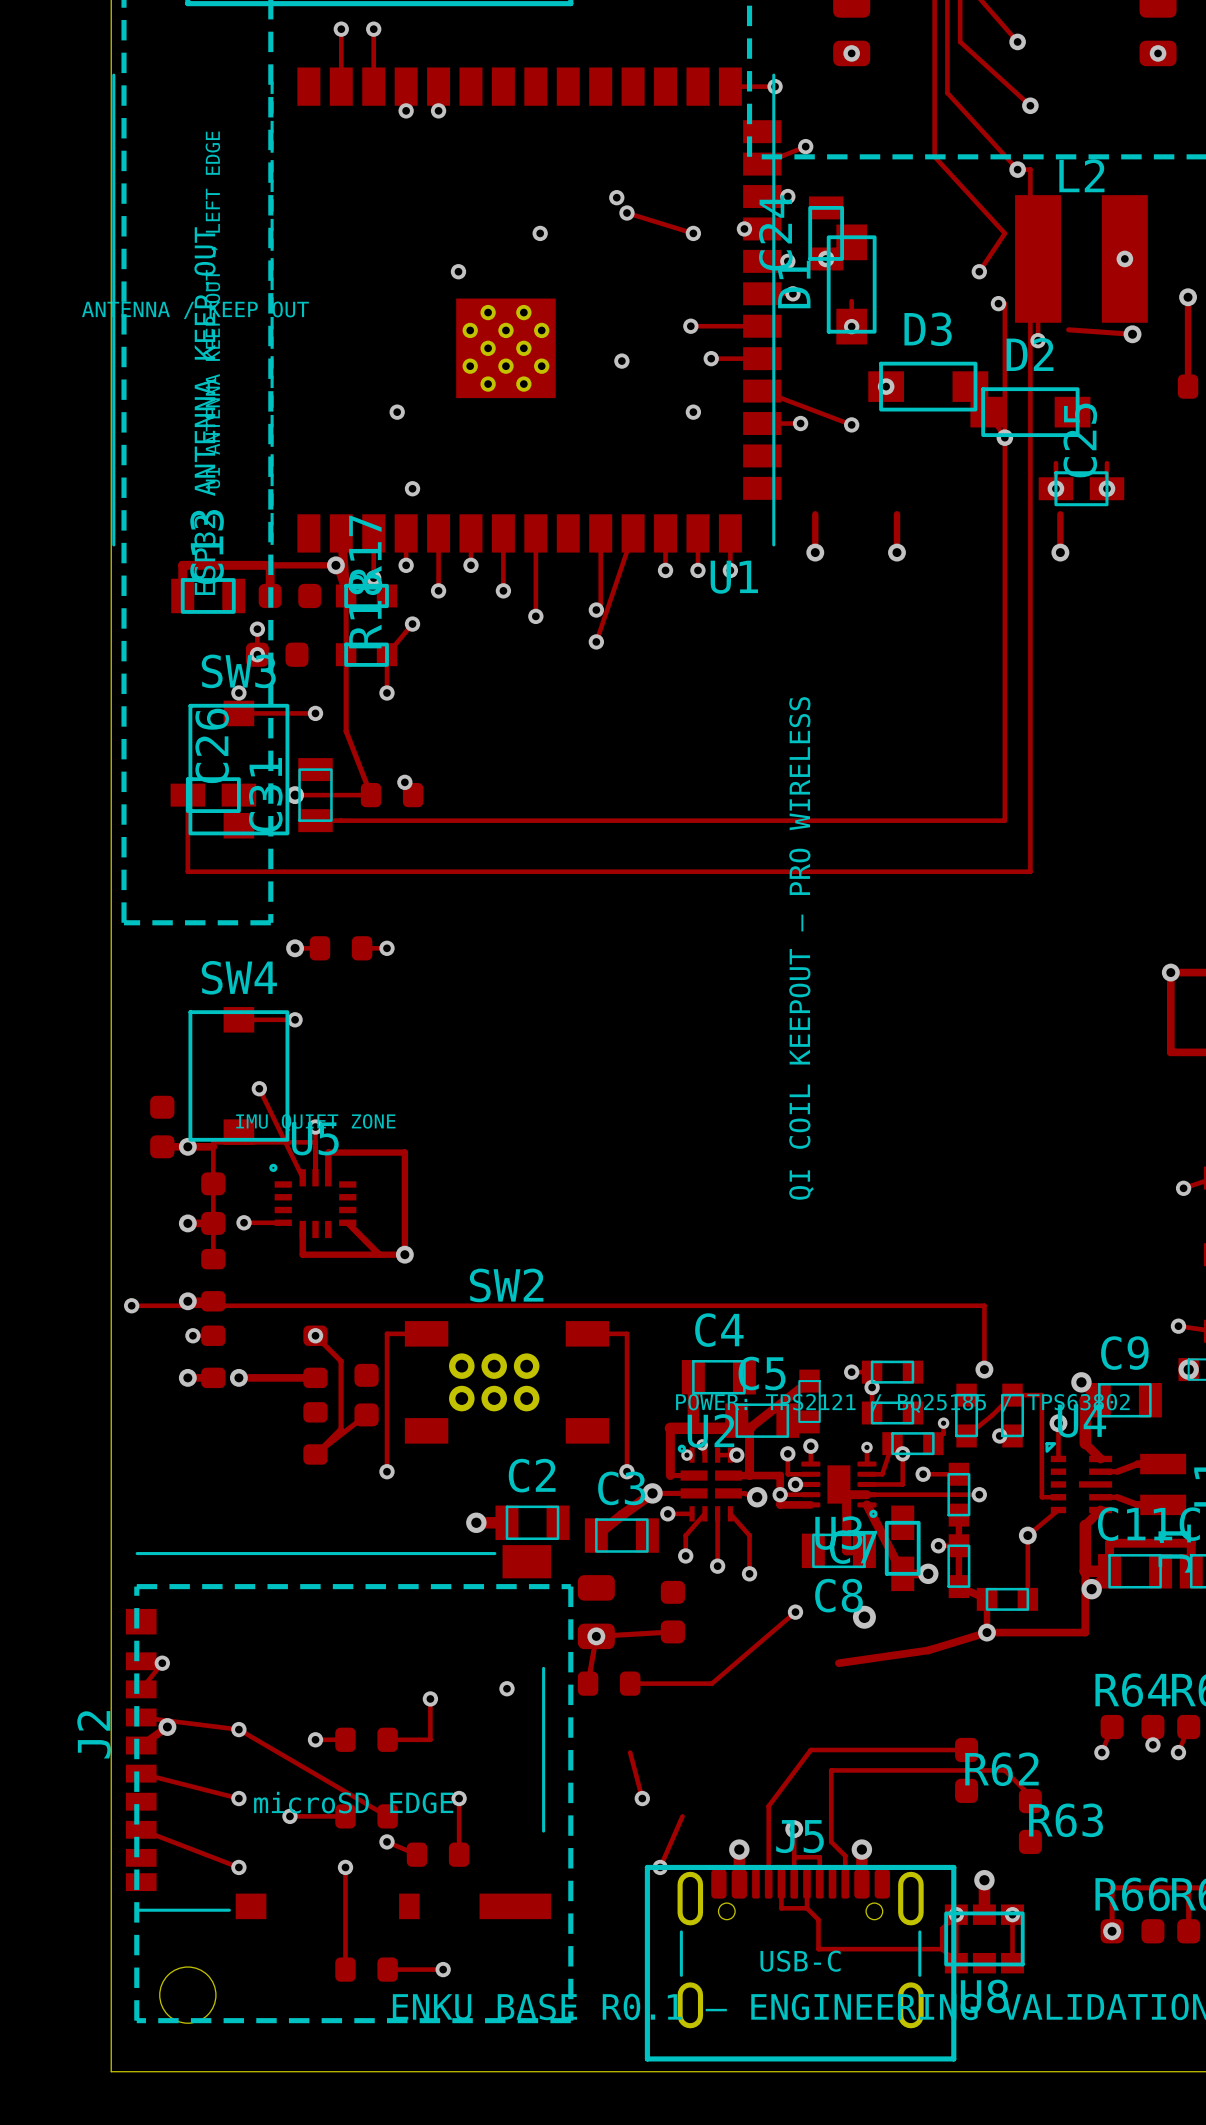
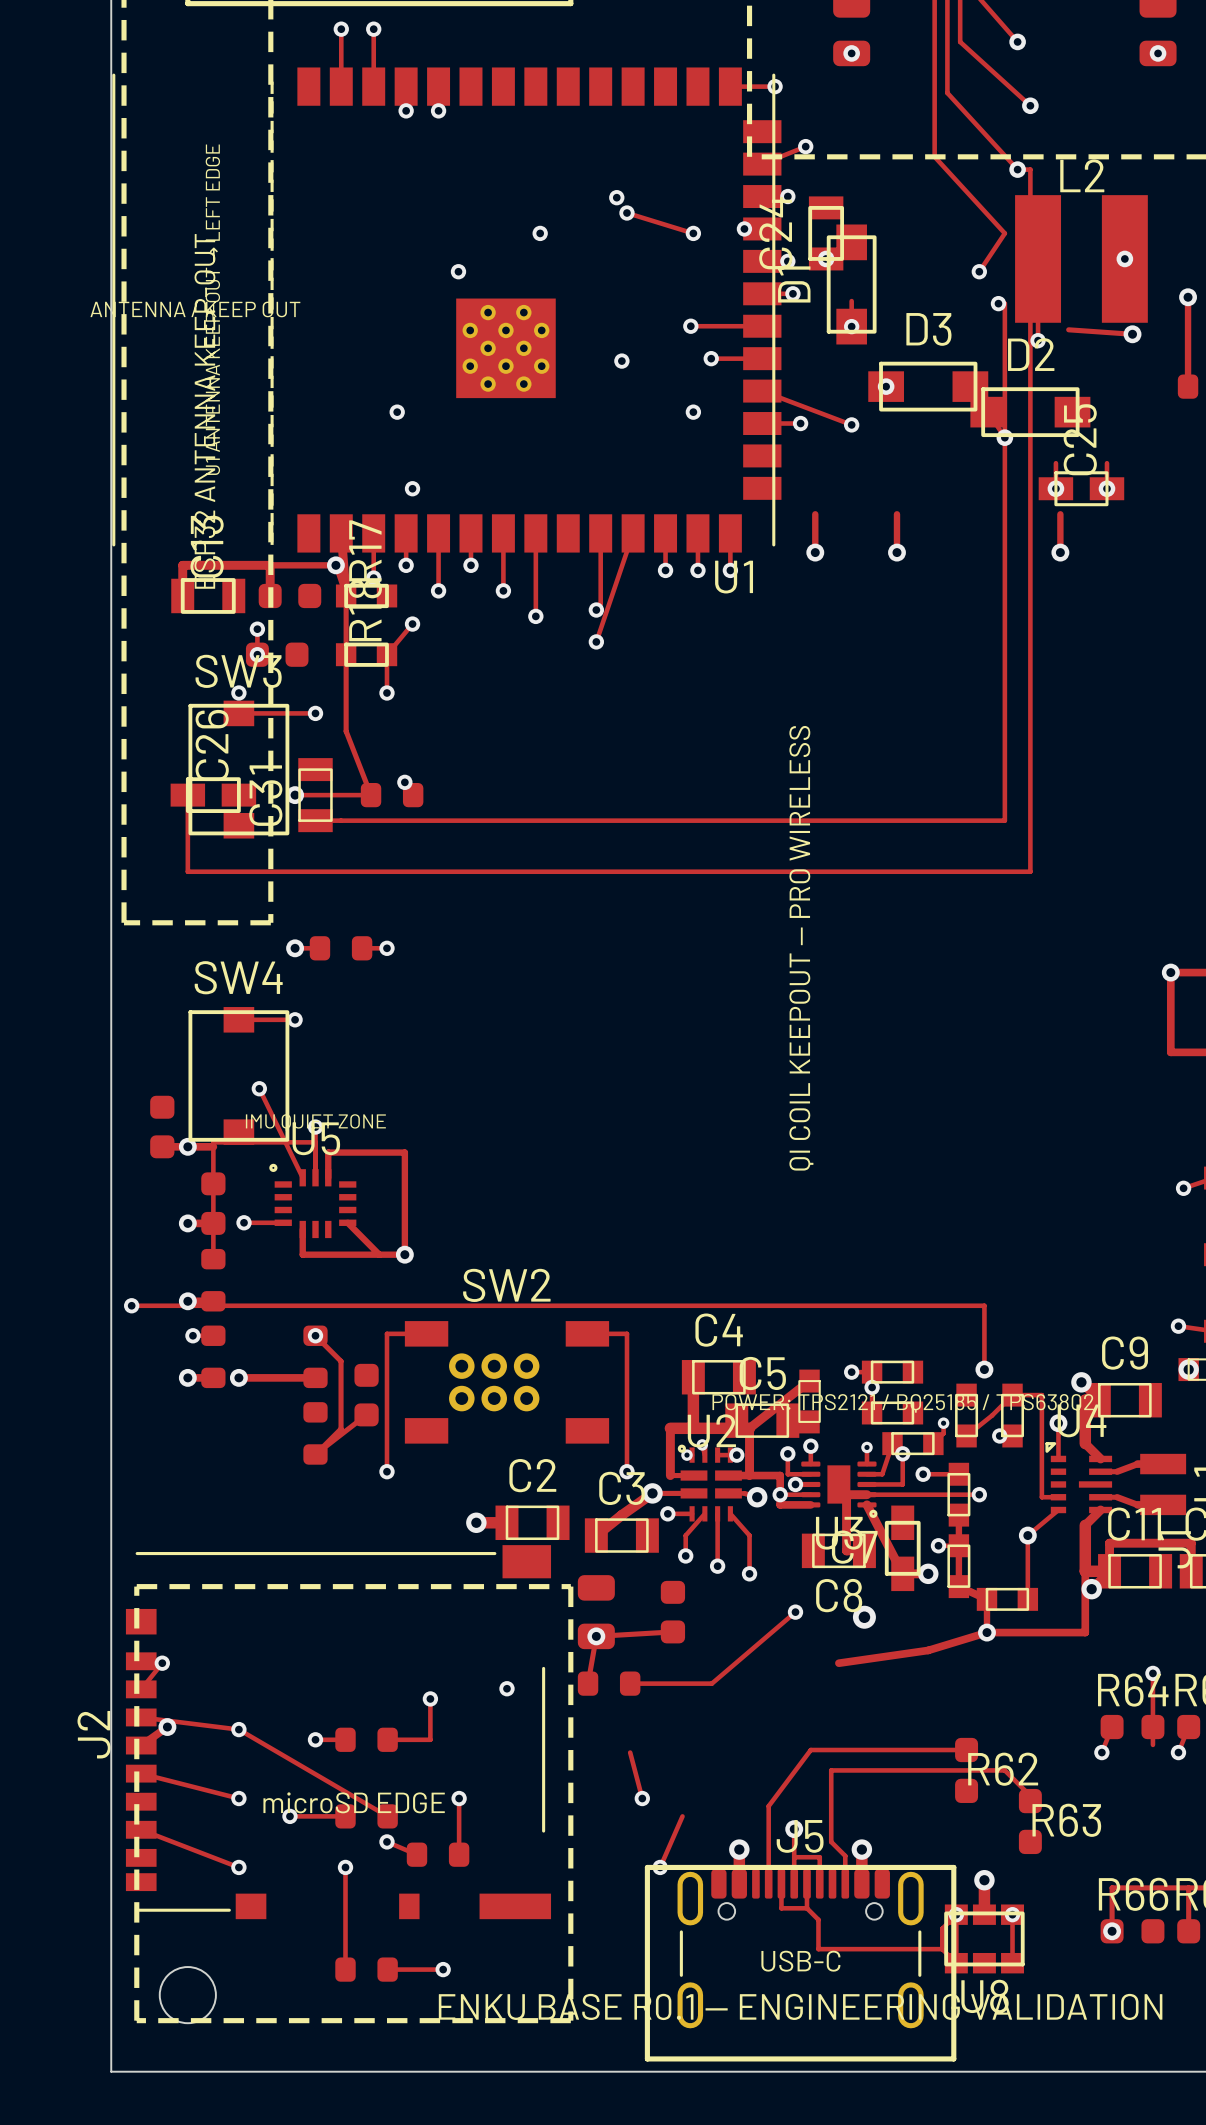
track: none -> (1152, 1673) (1152, 1727)
via: none -> (1152, 1673)
via: (1152, 1744) -> none

